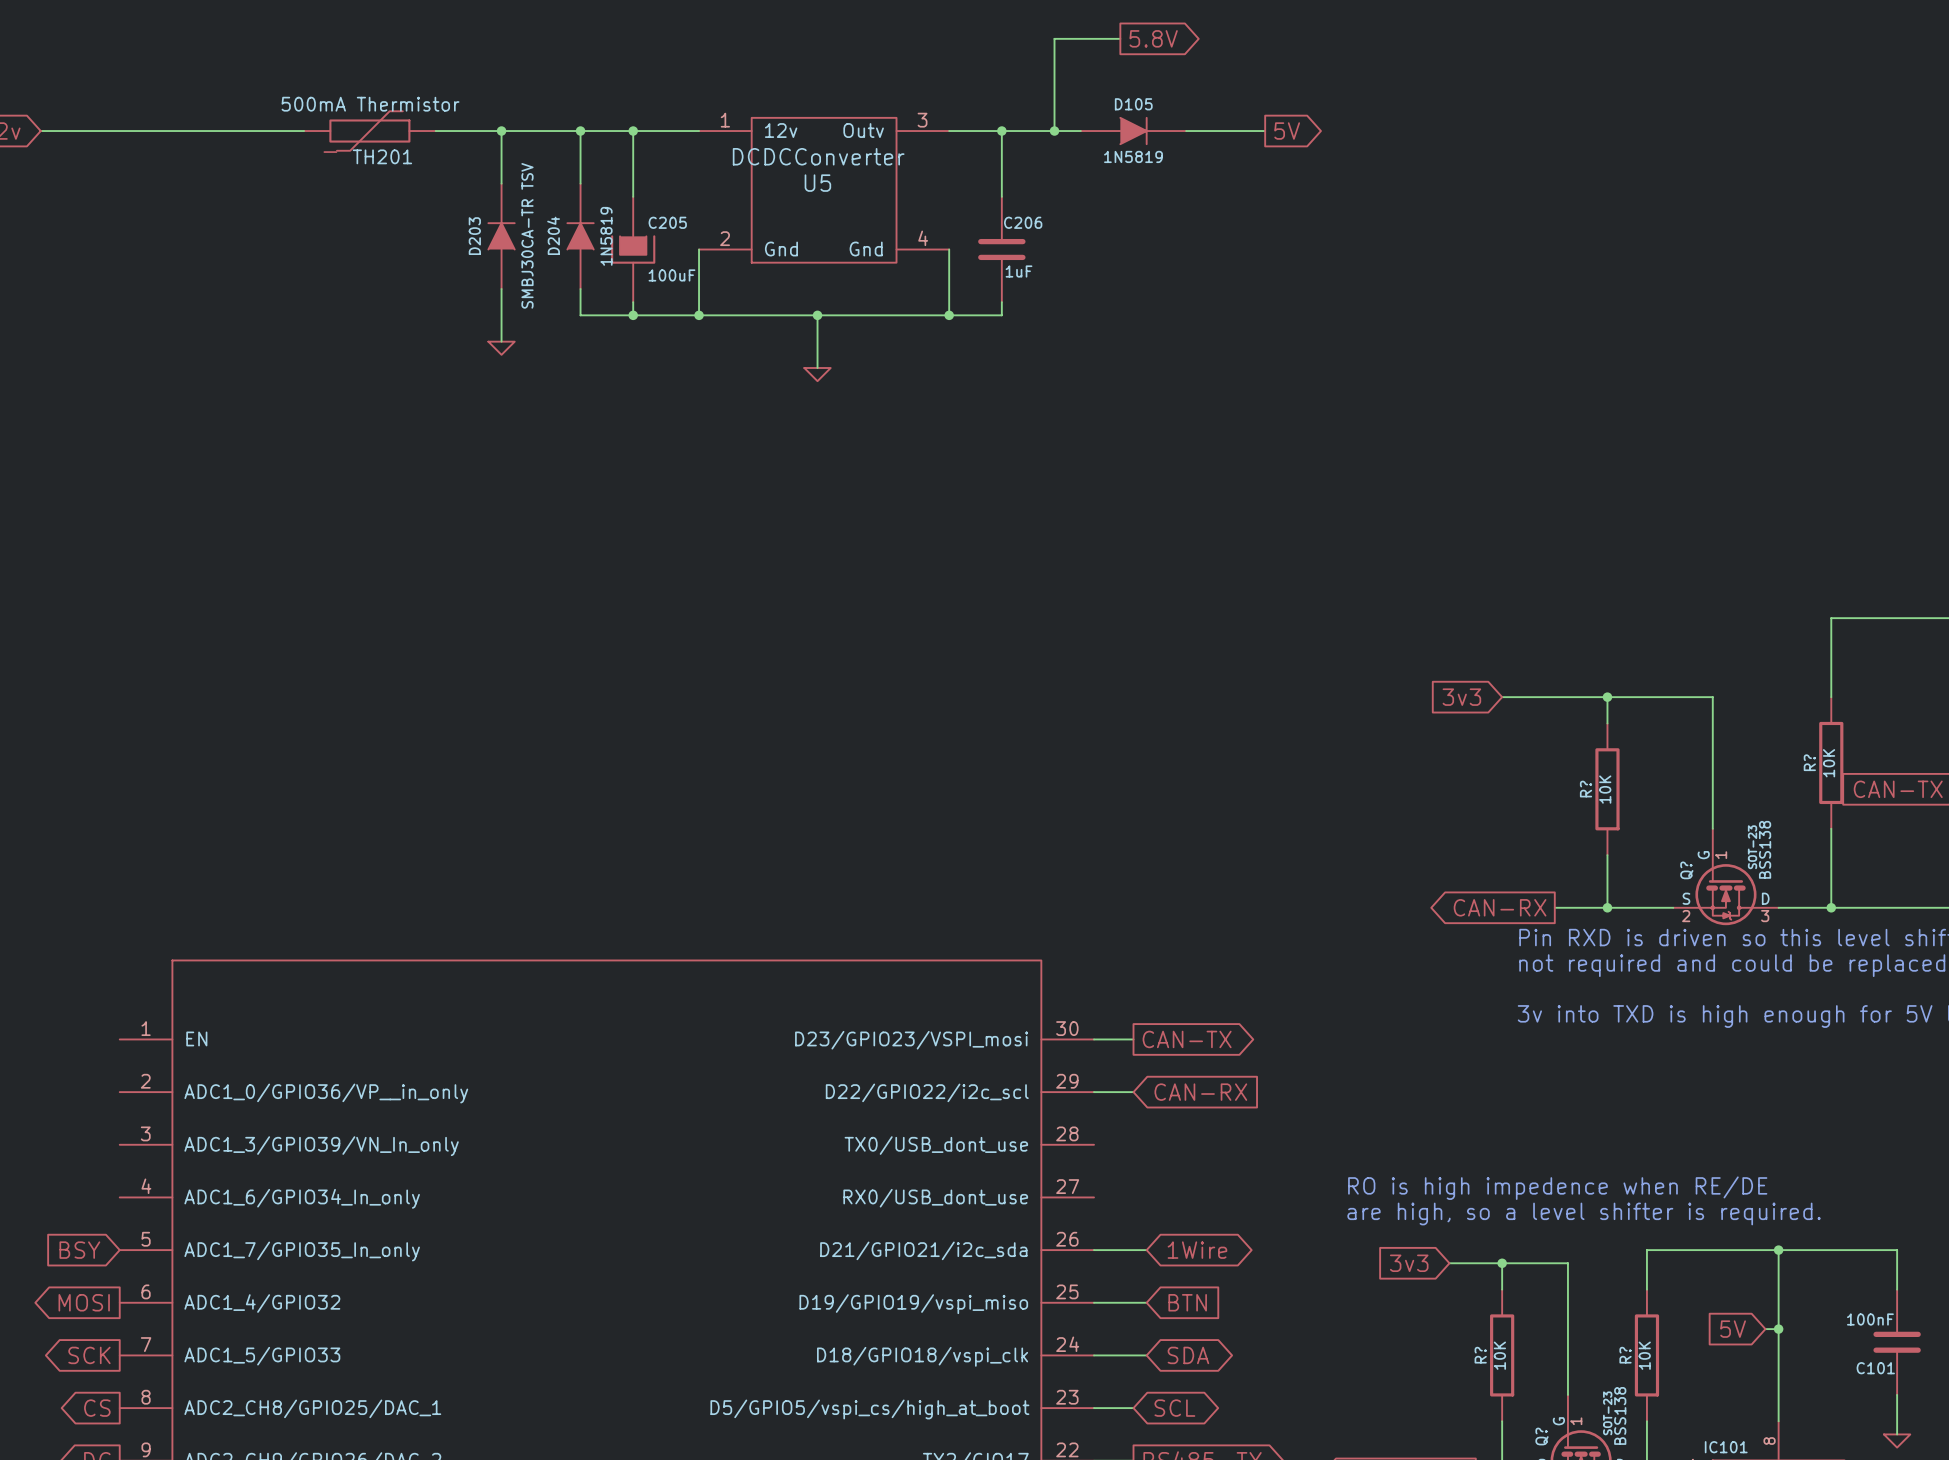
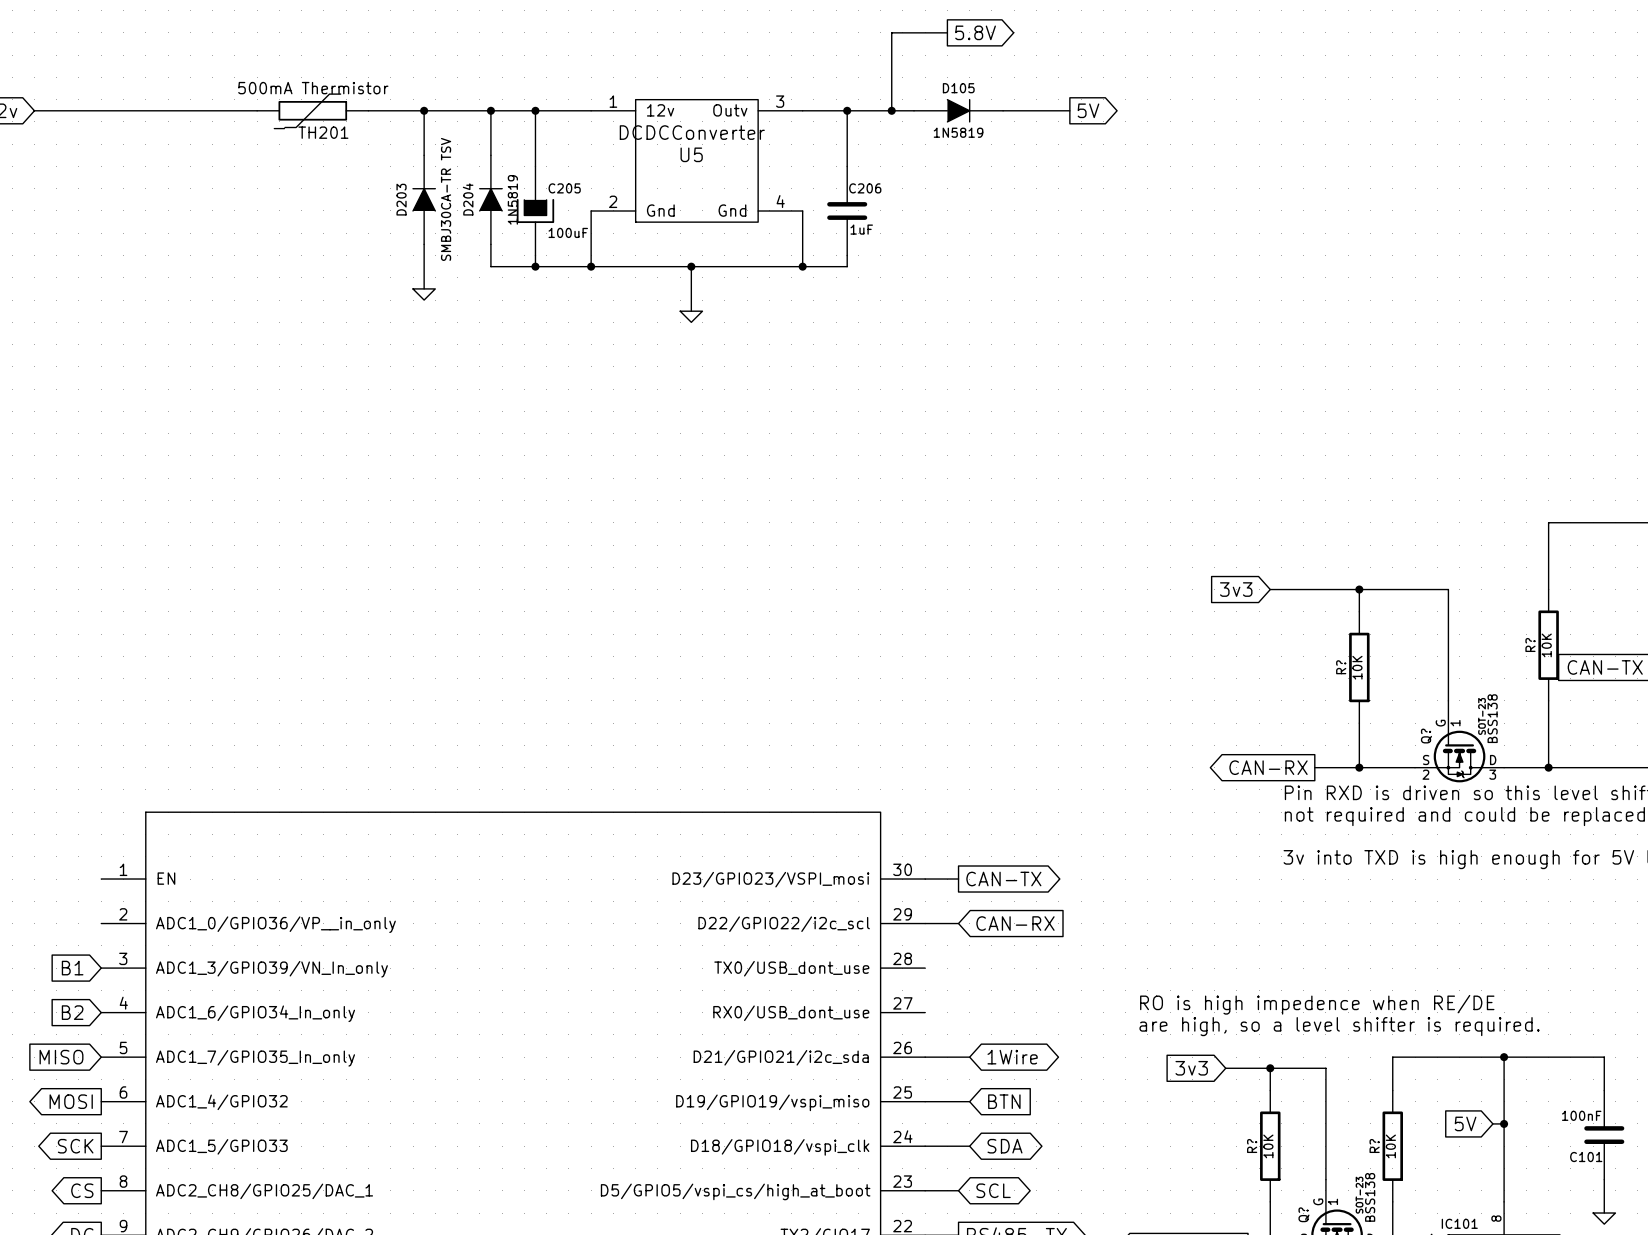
global label: none -> B1 (72, 968)
global label: none -> B2 (72, 1012)
global label: BSY (79, 1250) -> MISO (61, 1057)

